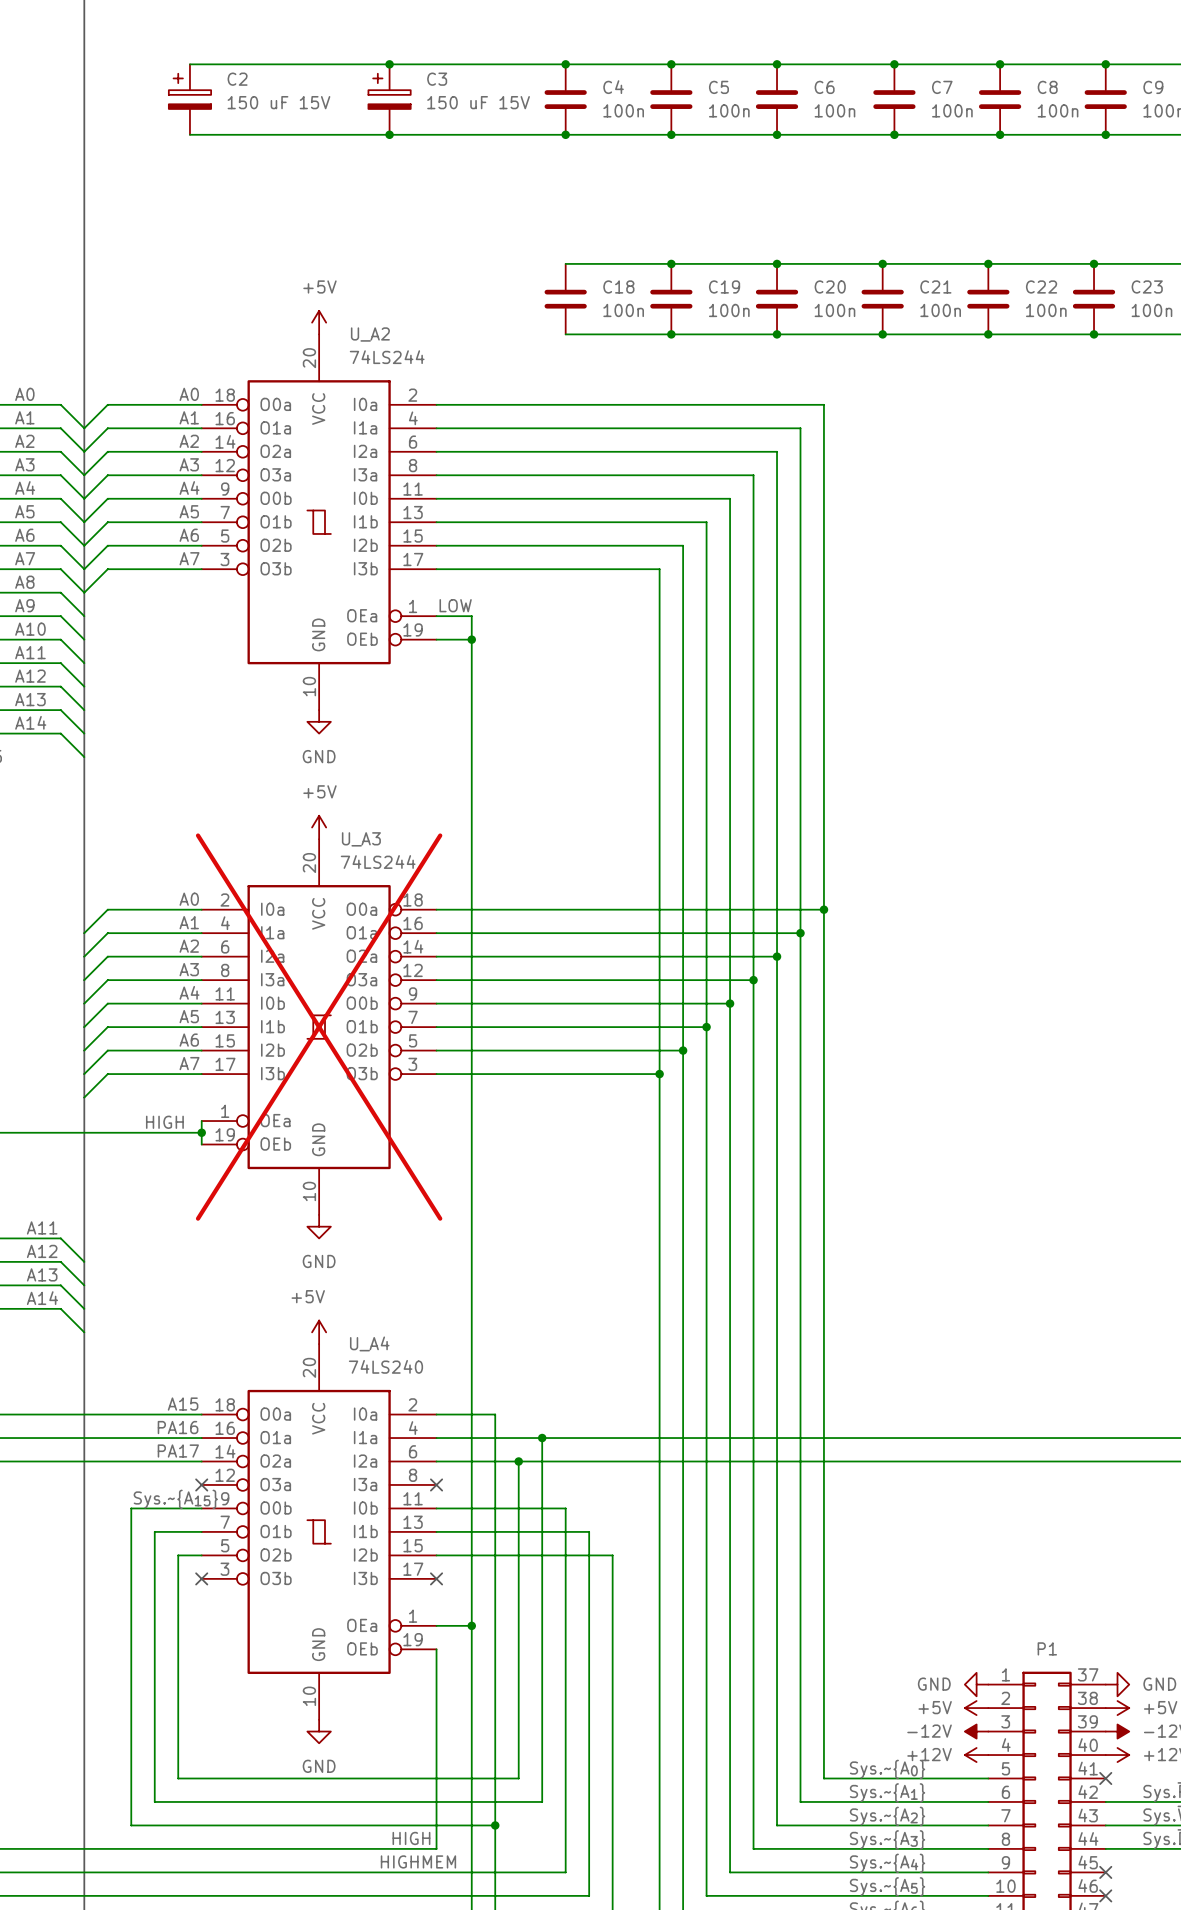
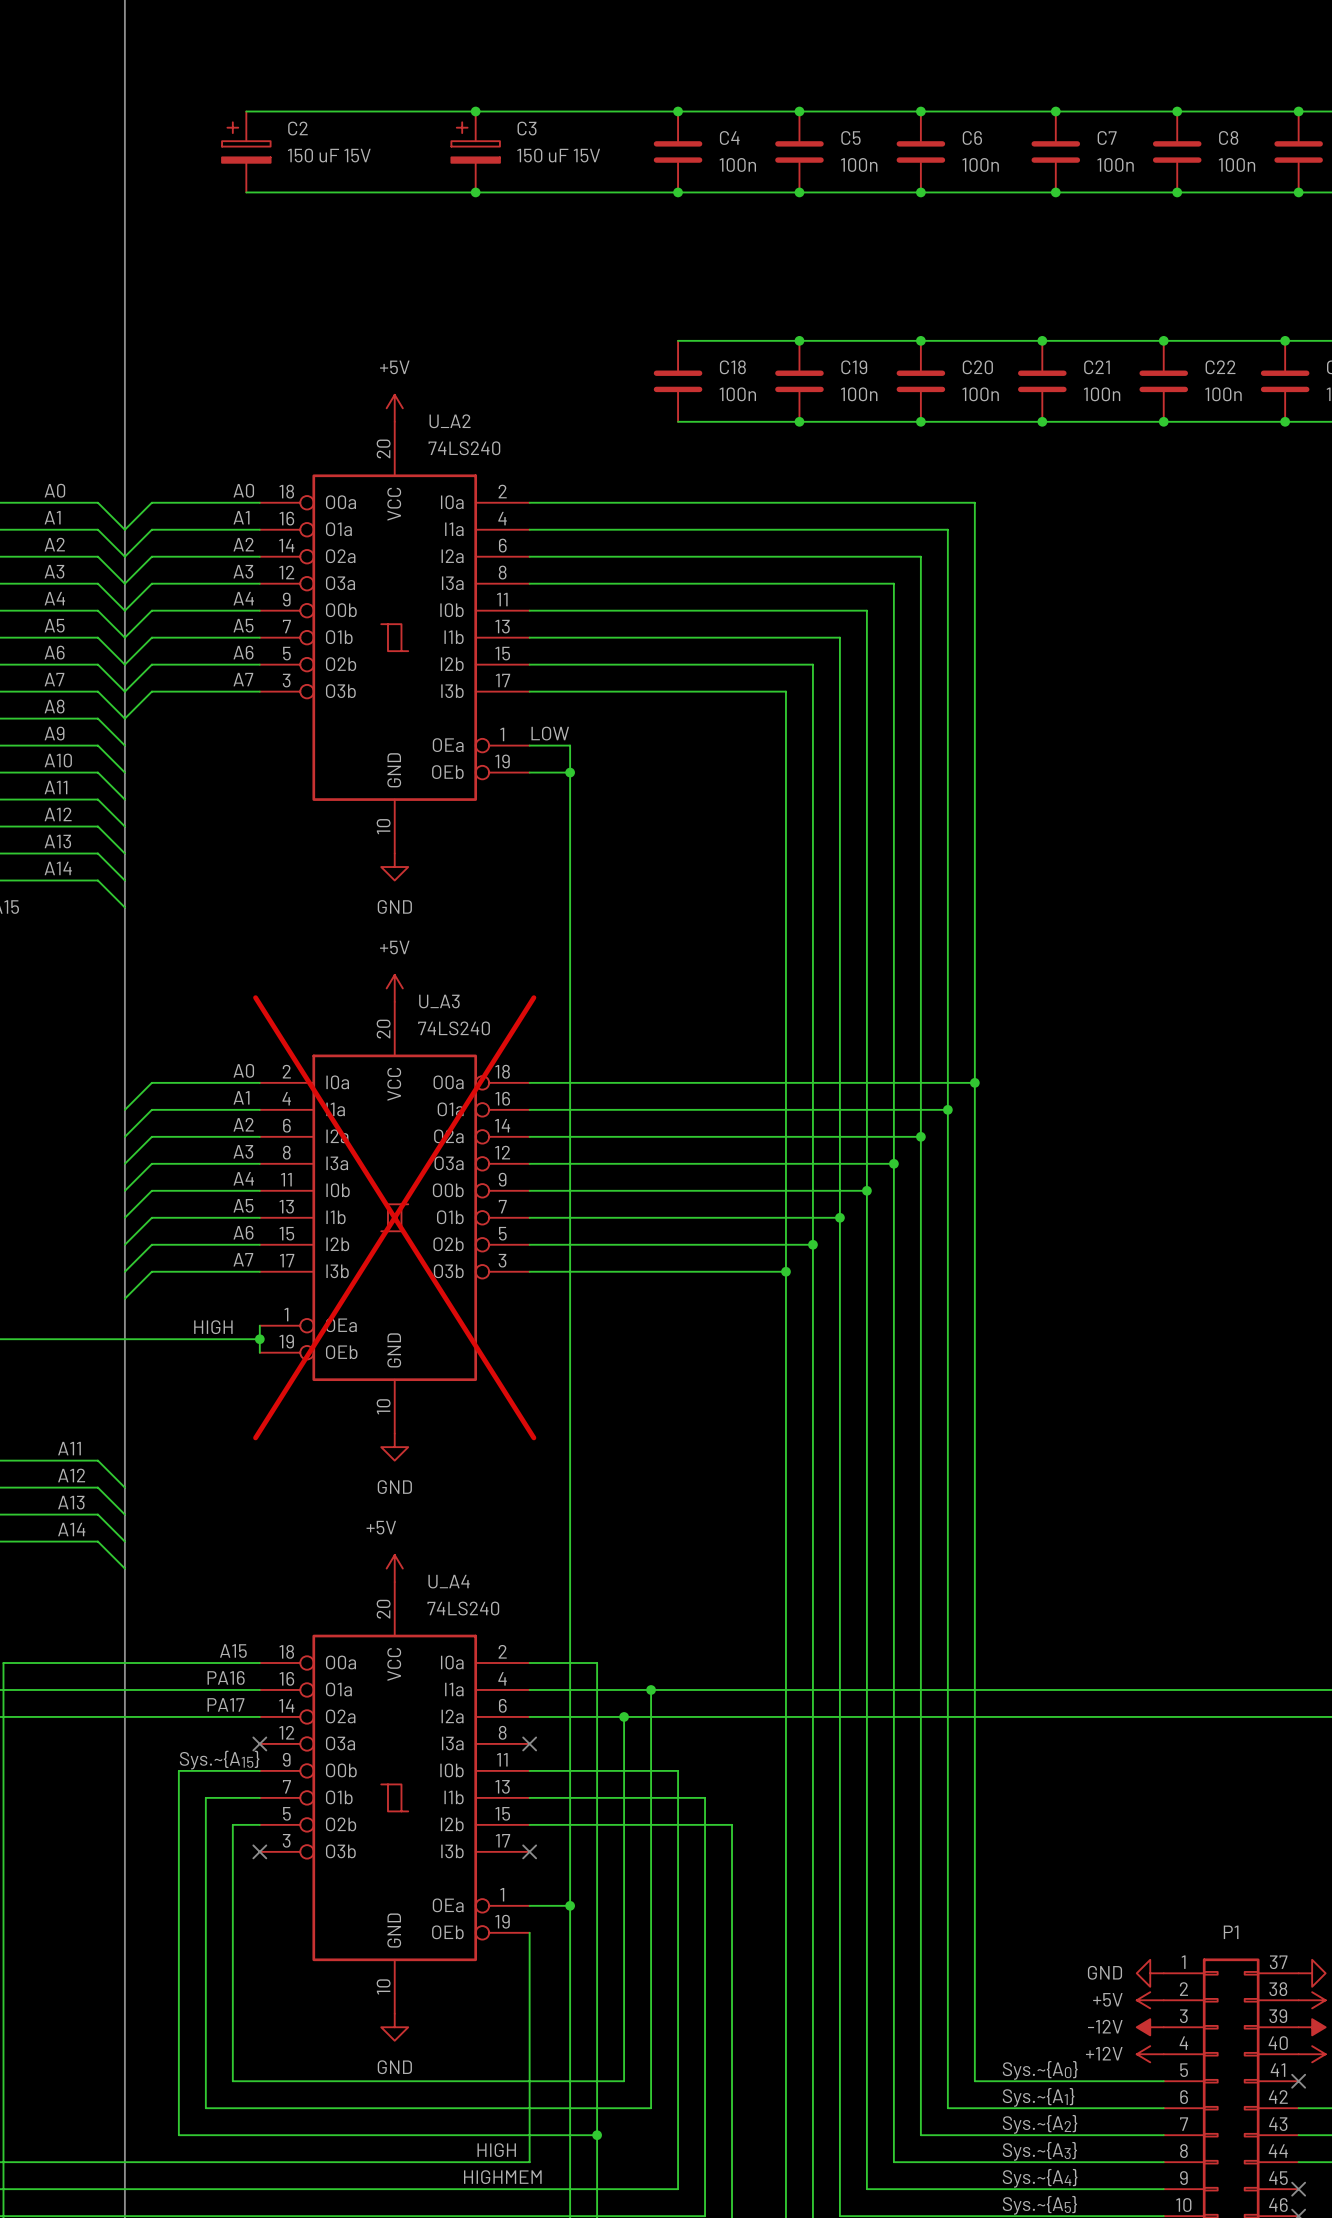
U_A2 value: 74LS244 (387, 357) -> 74LS240 (464, 448)
U_A3 value: 74LS244 (378, 862) -> 74LS240 (454, 1028)

